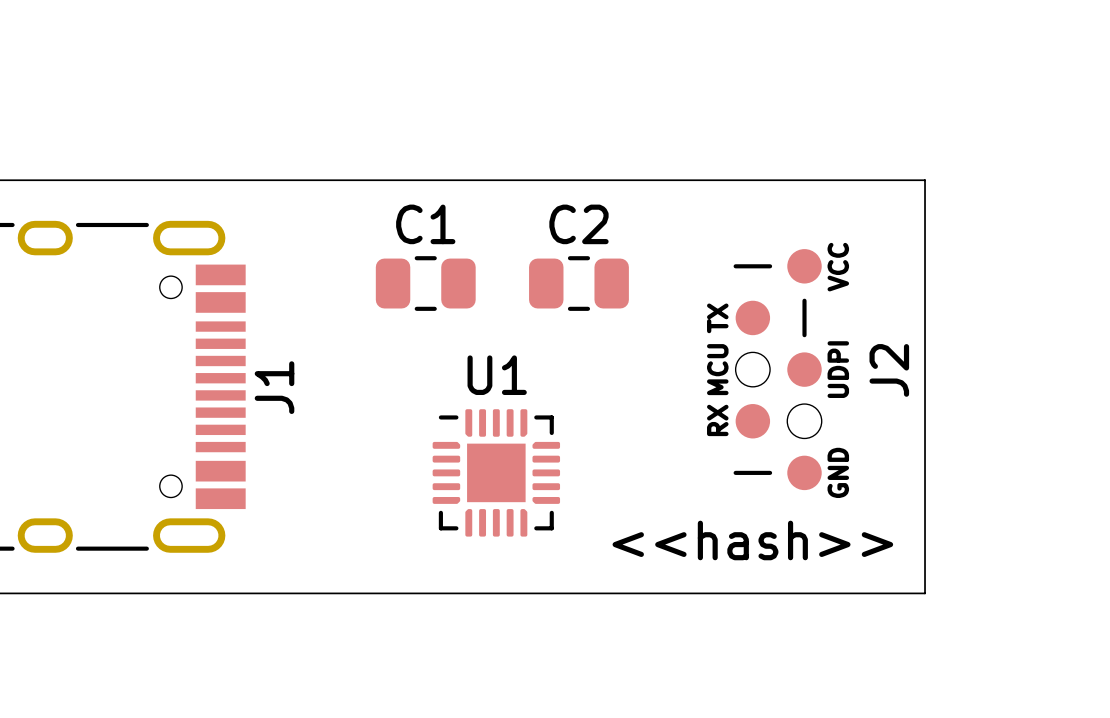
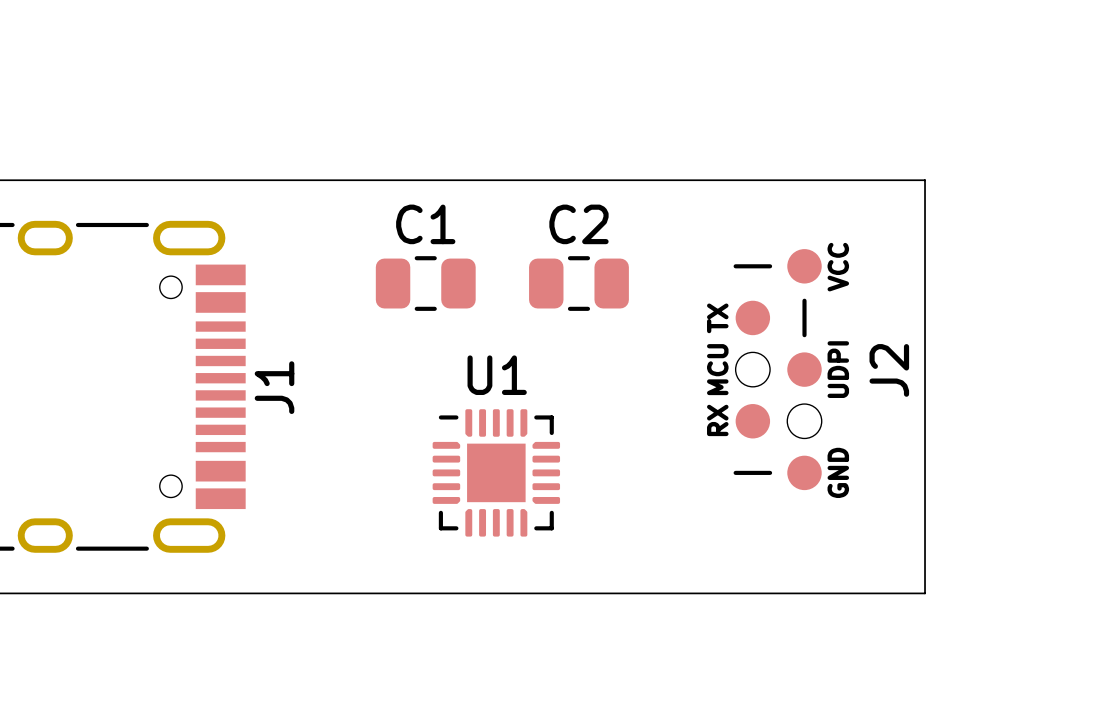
text: <<hash>> (752, 540) -> none

